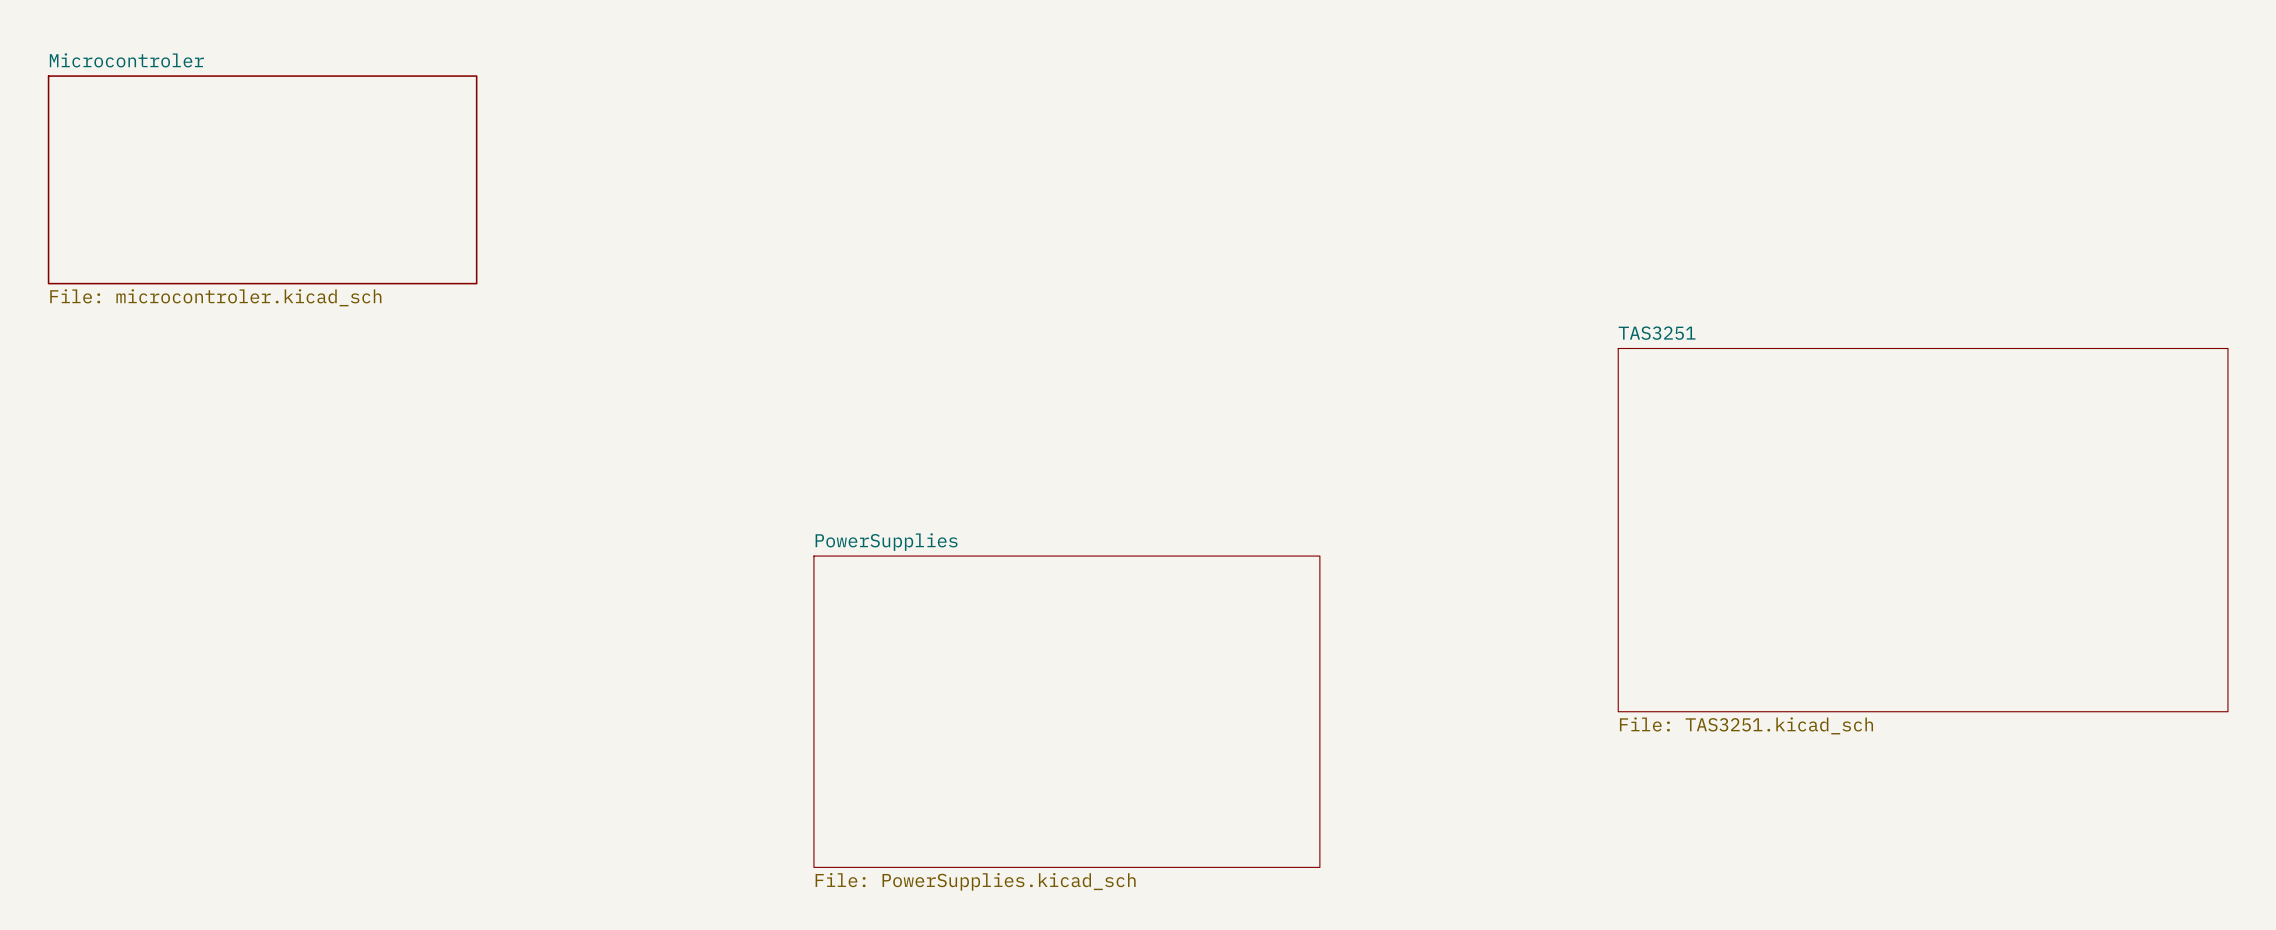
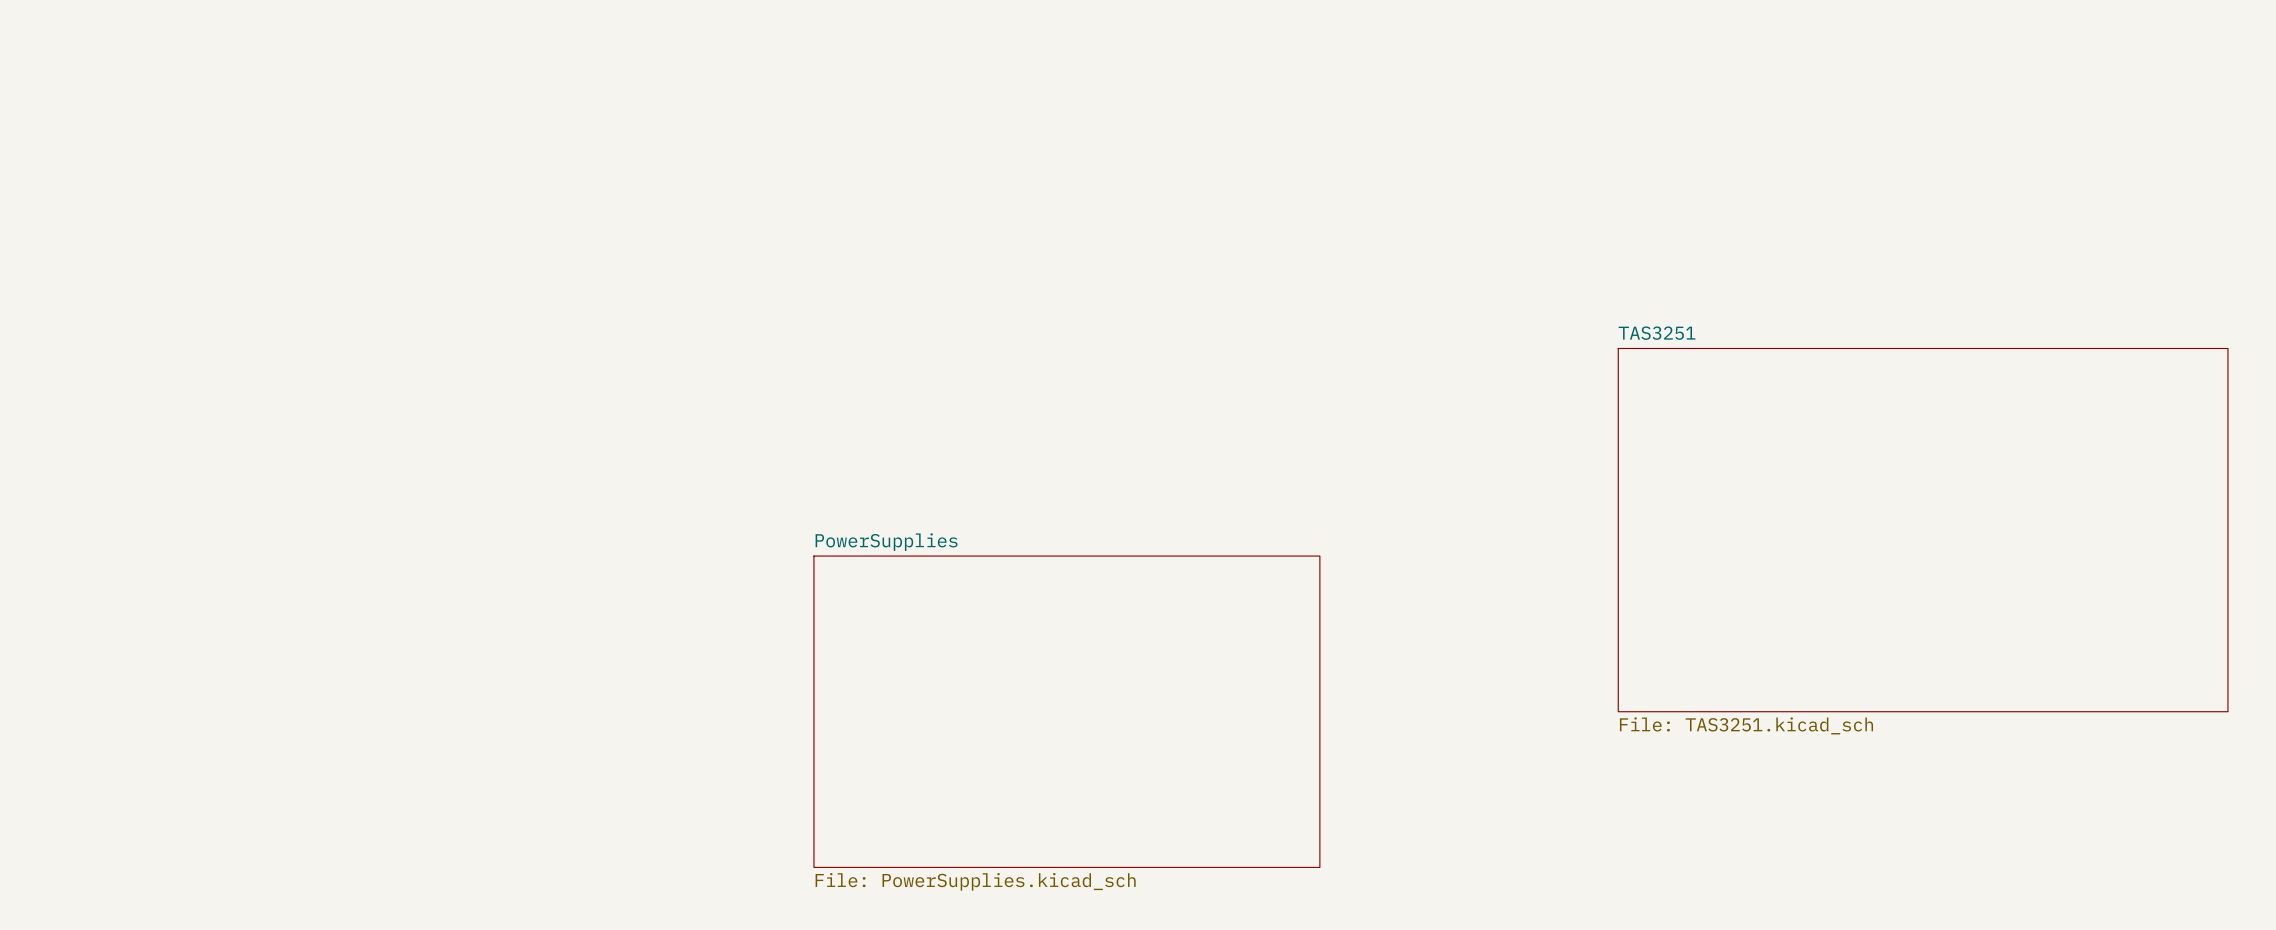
sheet Microcontroler: File: microcontroler.kicad_sch (262, 179) -> none

